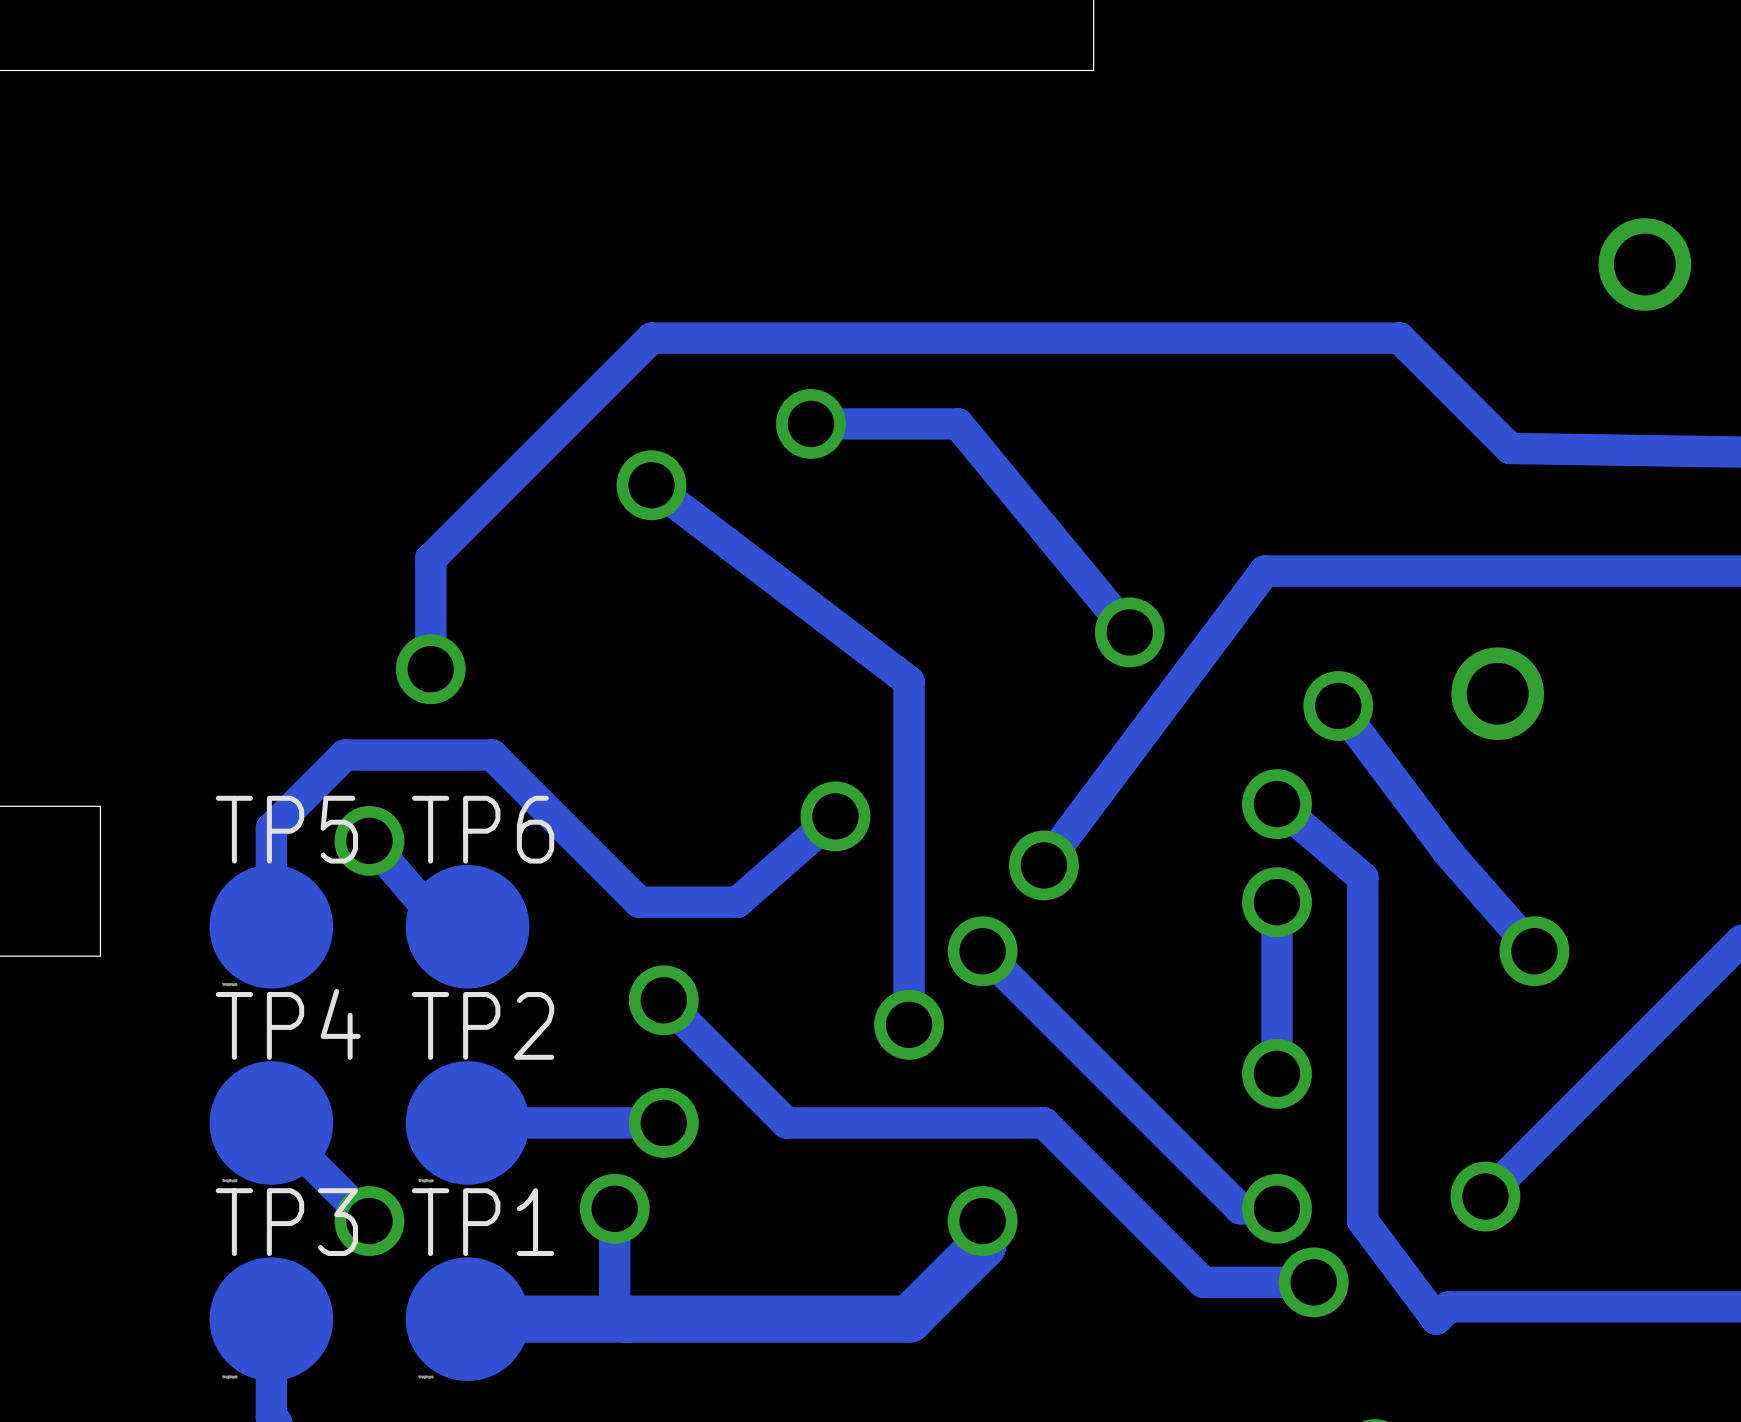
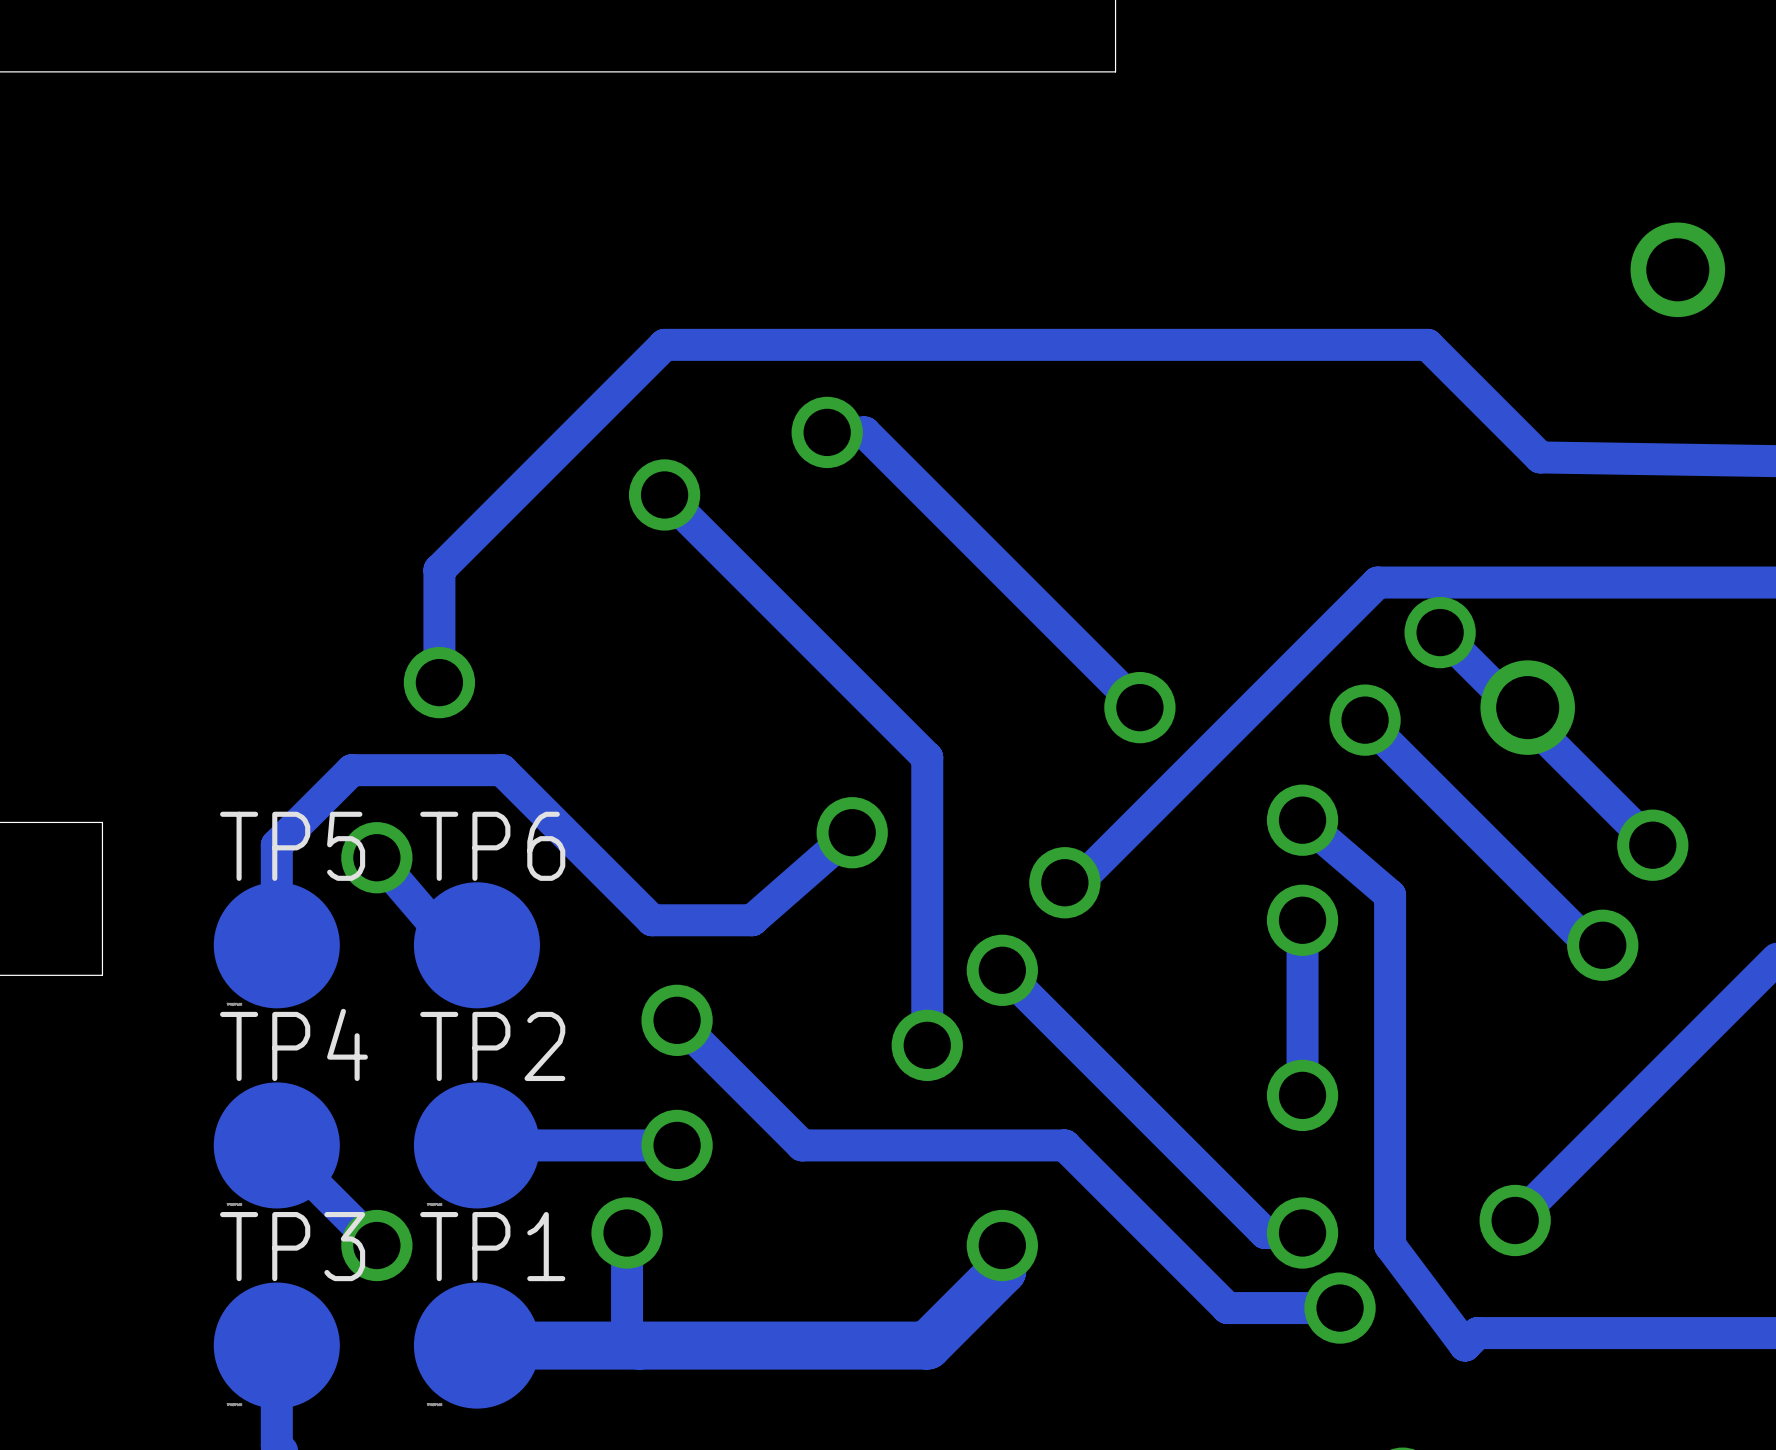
track: (847, 423) (958, 423) (1129, 632) -> (864, 432) (1139, 707)
track: (651, 485) (909, 681) (909, 742) -> (664, 494) (927, 757)
track: (1350, 571) (1264, 571) (1043, 865) -> (1377, 582) (1077, 882) (1064, 882)
track: none -> (1440, 632) (1652, 845)
via: none -> (1440, 632)
via position: (1129, 632) -> (1139, 707)
track: (1338, 705) (1448, 853) (1534, 951) -> (1365, 720) (1590, 945) (1602, 945)
via: none -> (1652, 845)
via position: (1534, 951) -> (1602, 945)

